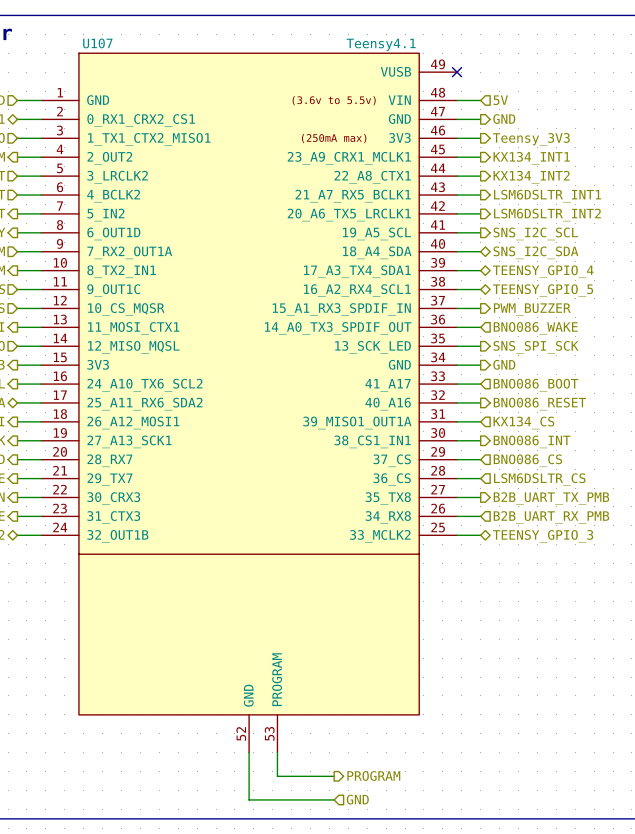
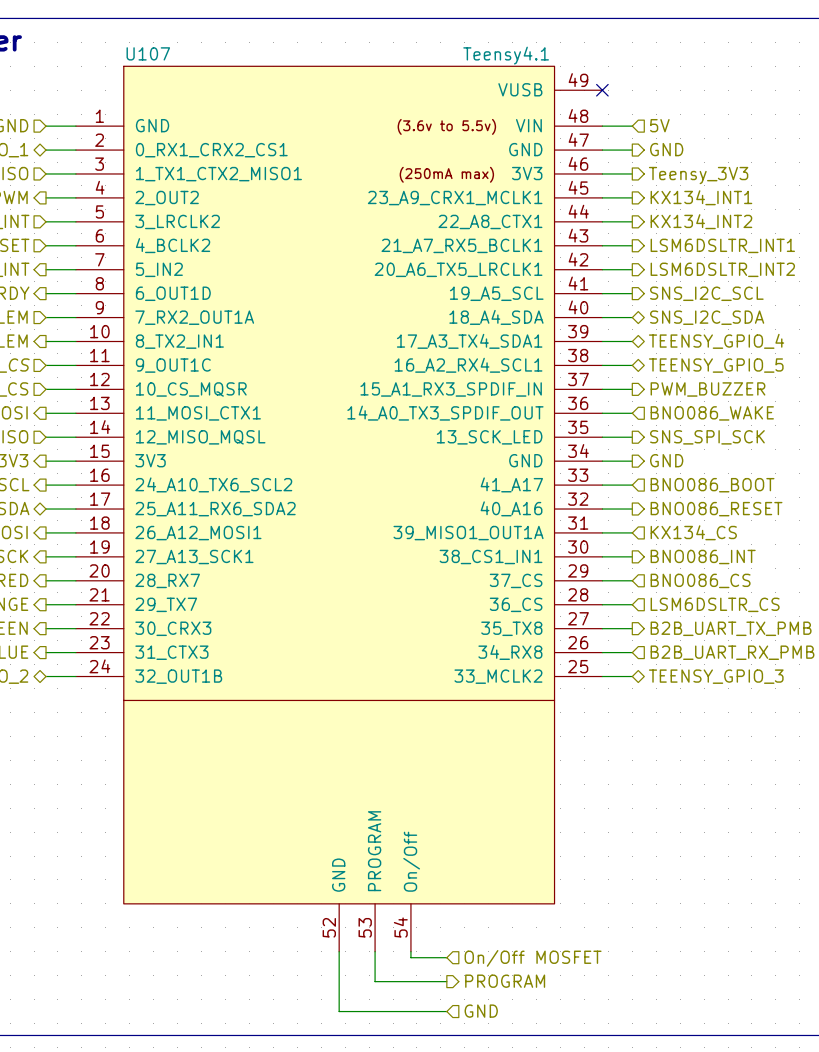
U107 symbol: [41, 53, 458, 753] -> [75, 66, 603, 952]
wire: none -> (410, 951) (410, 957) (446, 957)
hierarchical label: none -> On/Off MOSFET (533, 958)

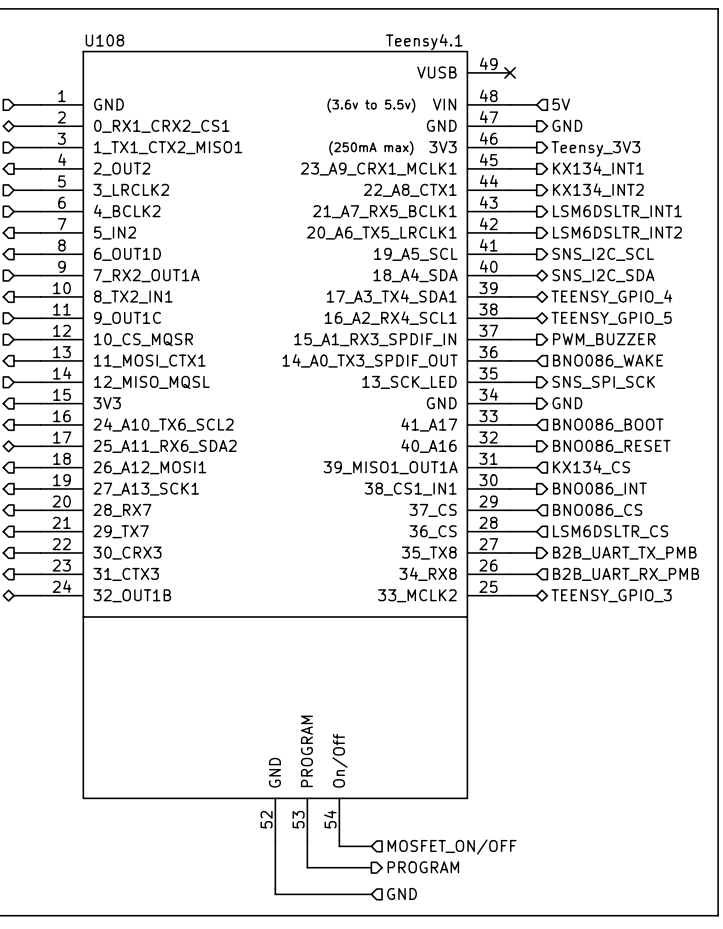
U107 name: U107 (148, 53) -> U108 (104, 40)
hierarchical label: On/Off MOSFET (533, 958) -> MOSFET_ON/OFF (452, 846)

